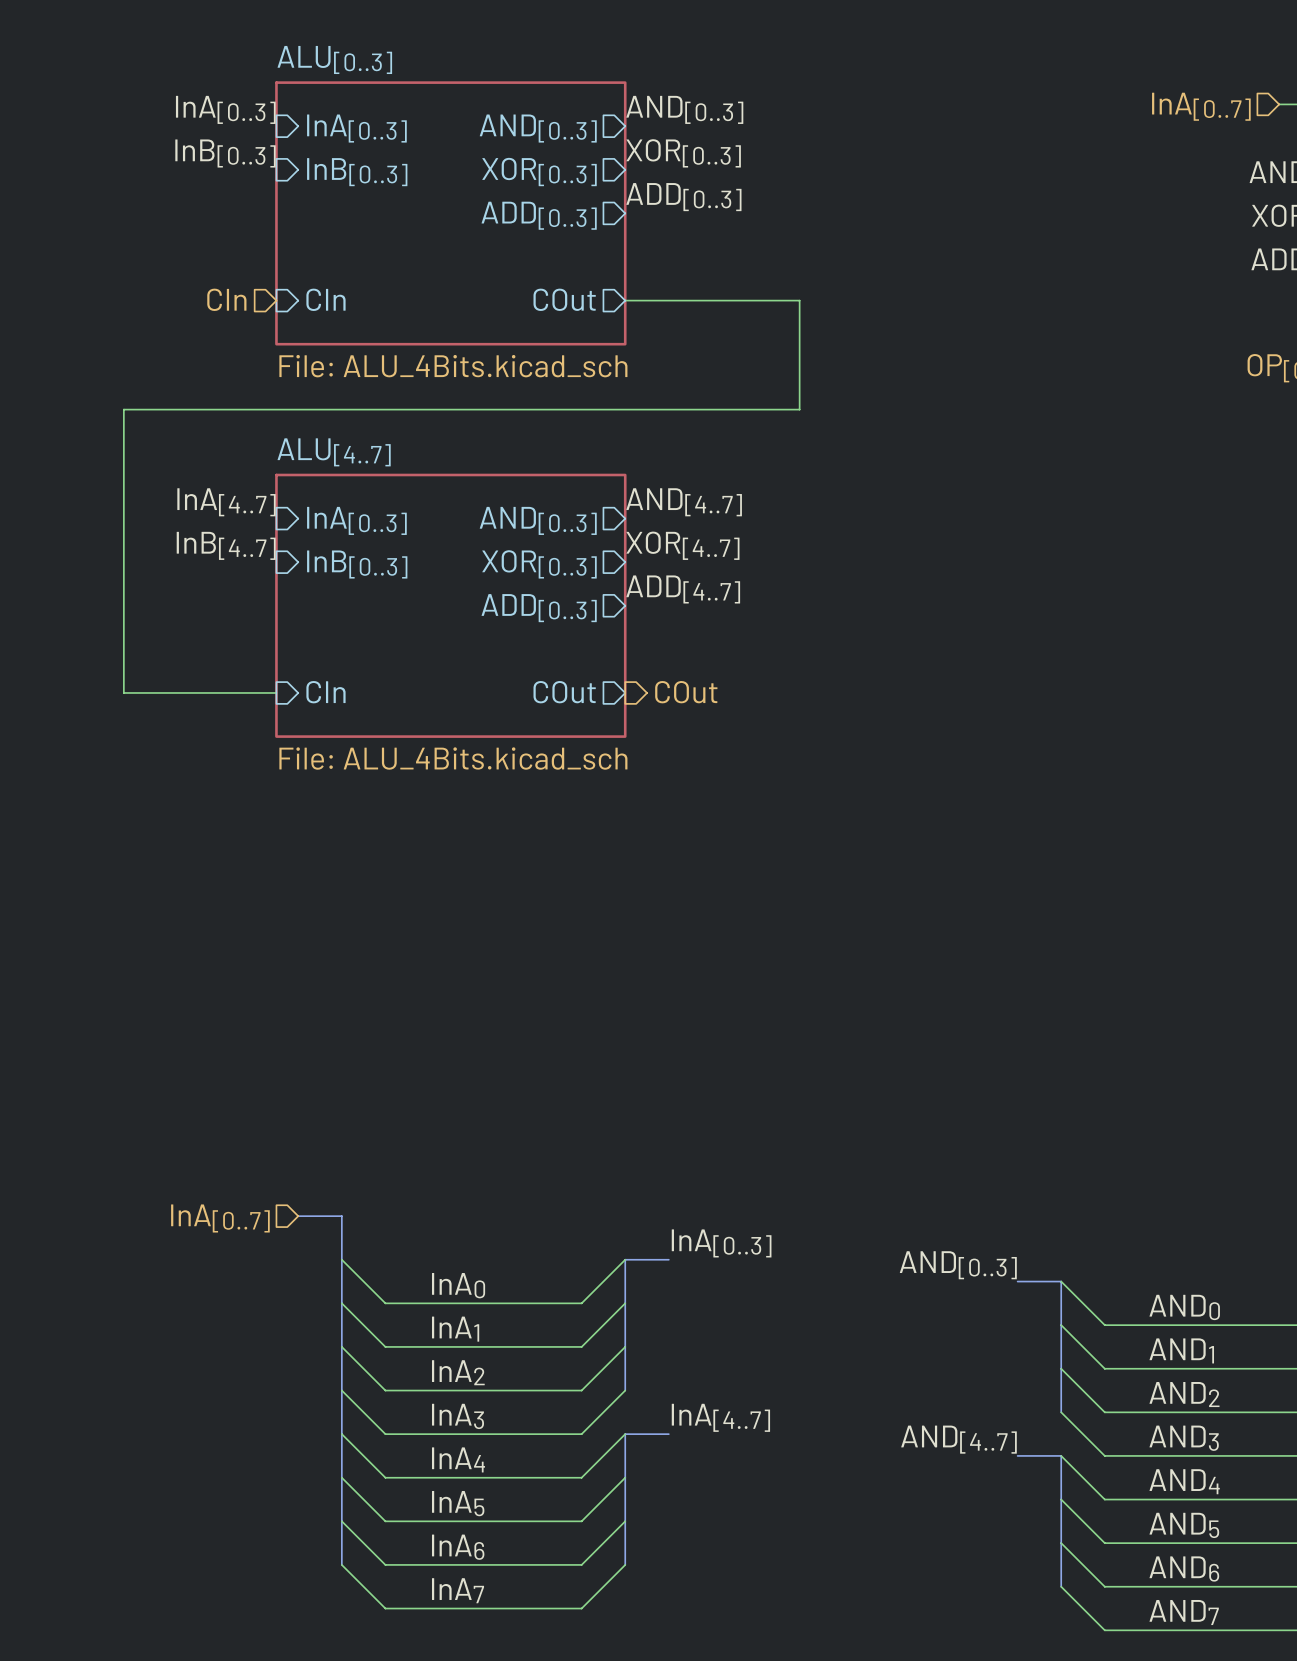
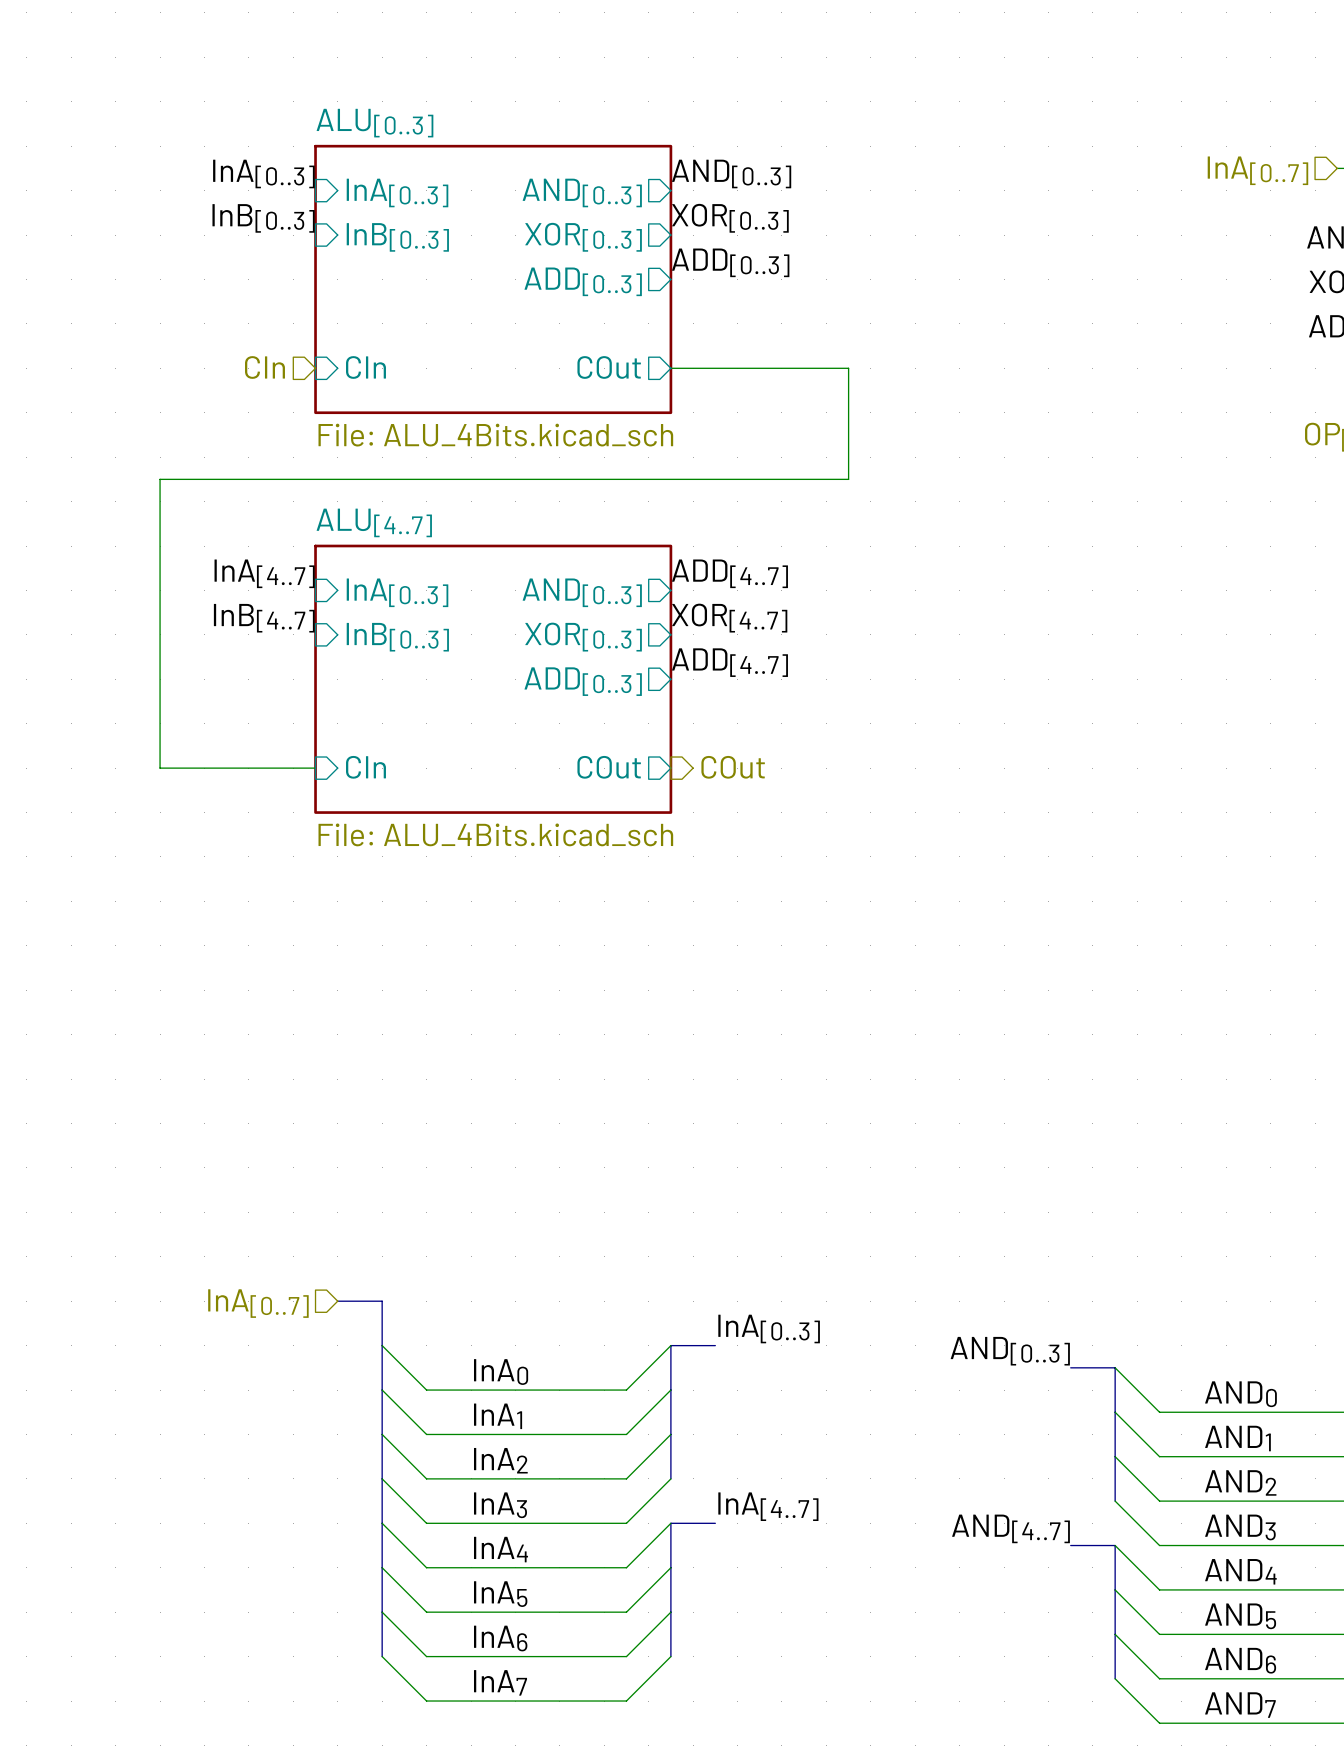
label: AND[4..7] (684, 502) -> ADD[4..7] (729, 573)

